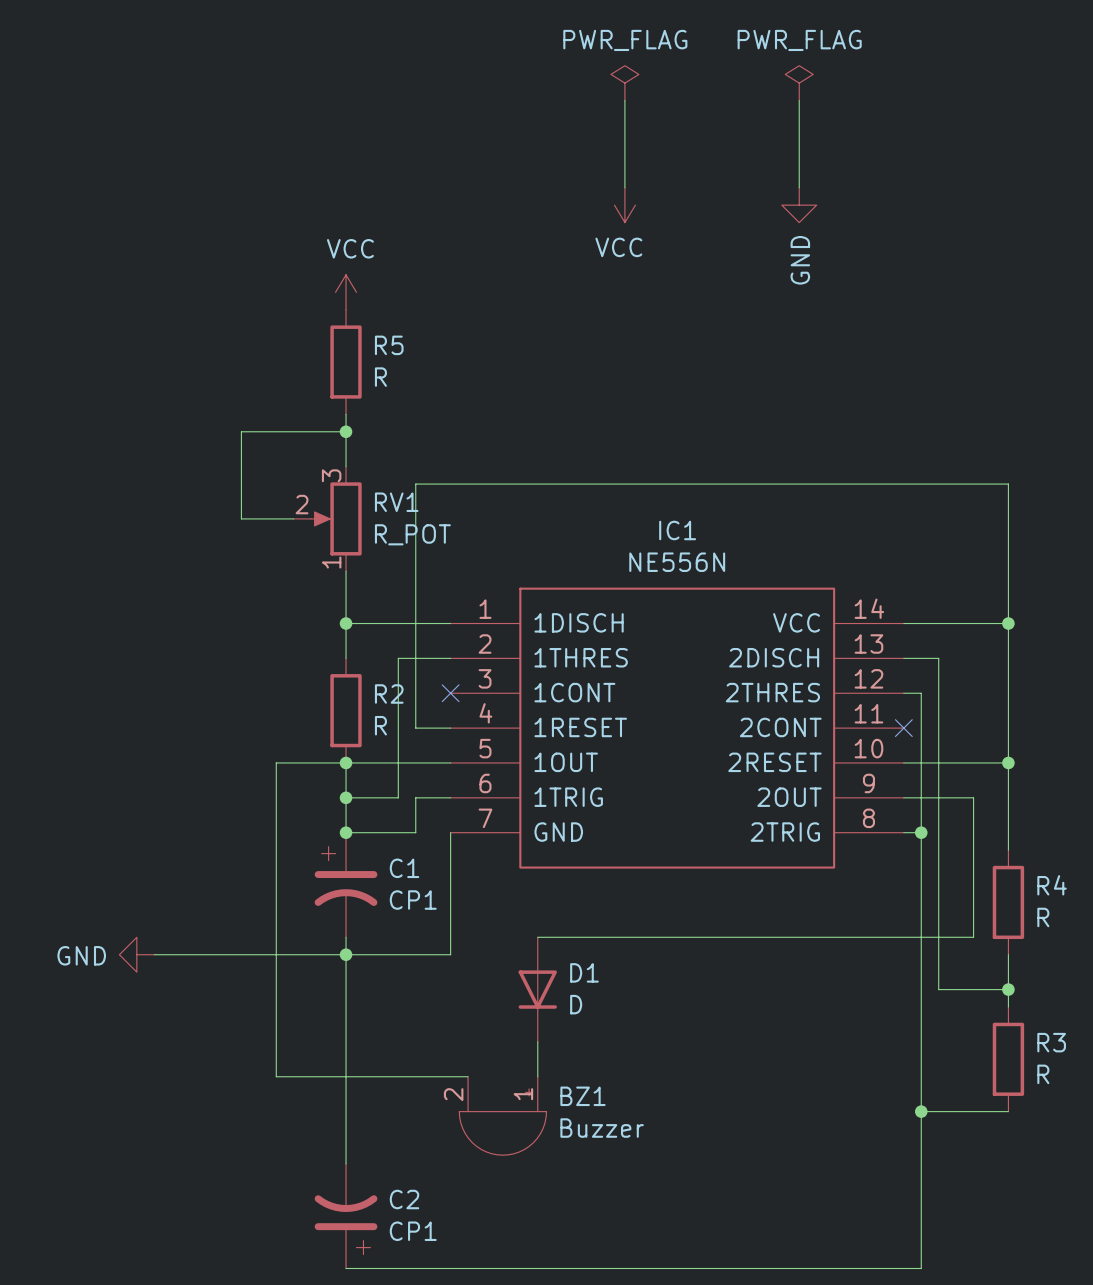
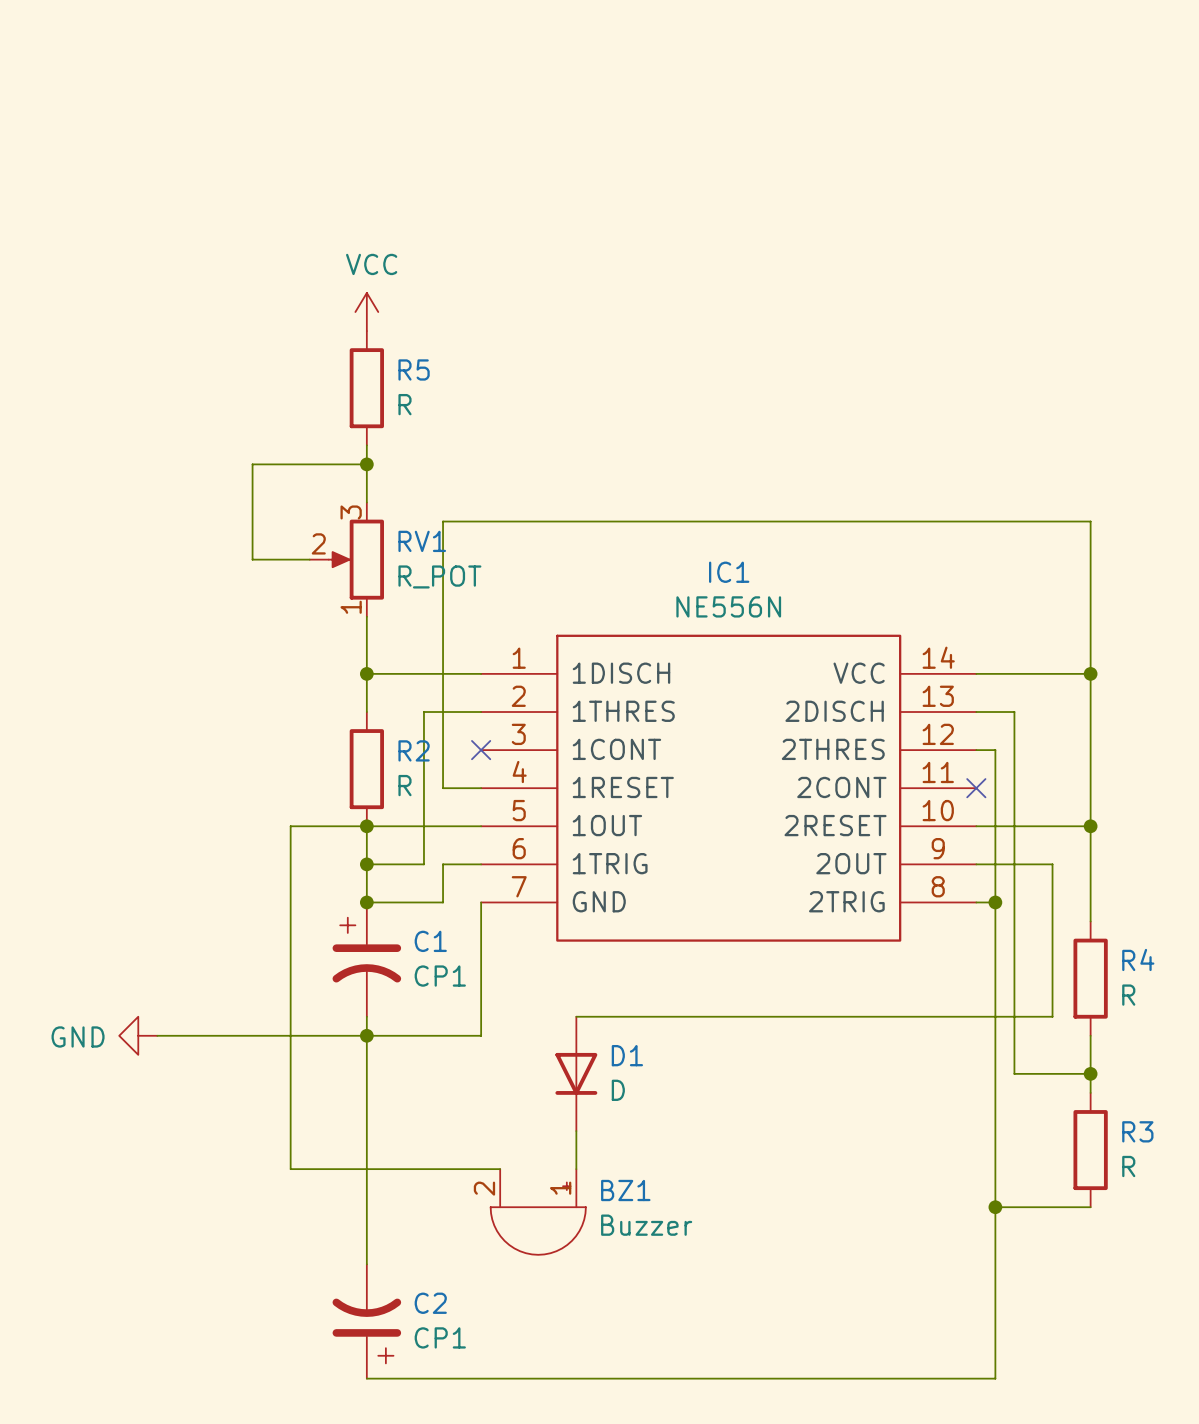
power symbol: PWR_FLAG (624, 83) -> none
power symbol: PWR_FLAG (799, 83) -> none
wire: (624, 100) (624, 187) -> none
wire: (799, 100) (799, 187) -> none
power symbol: VCC (624, 205) -> none
power symbol: GND (799, 205) -> none

